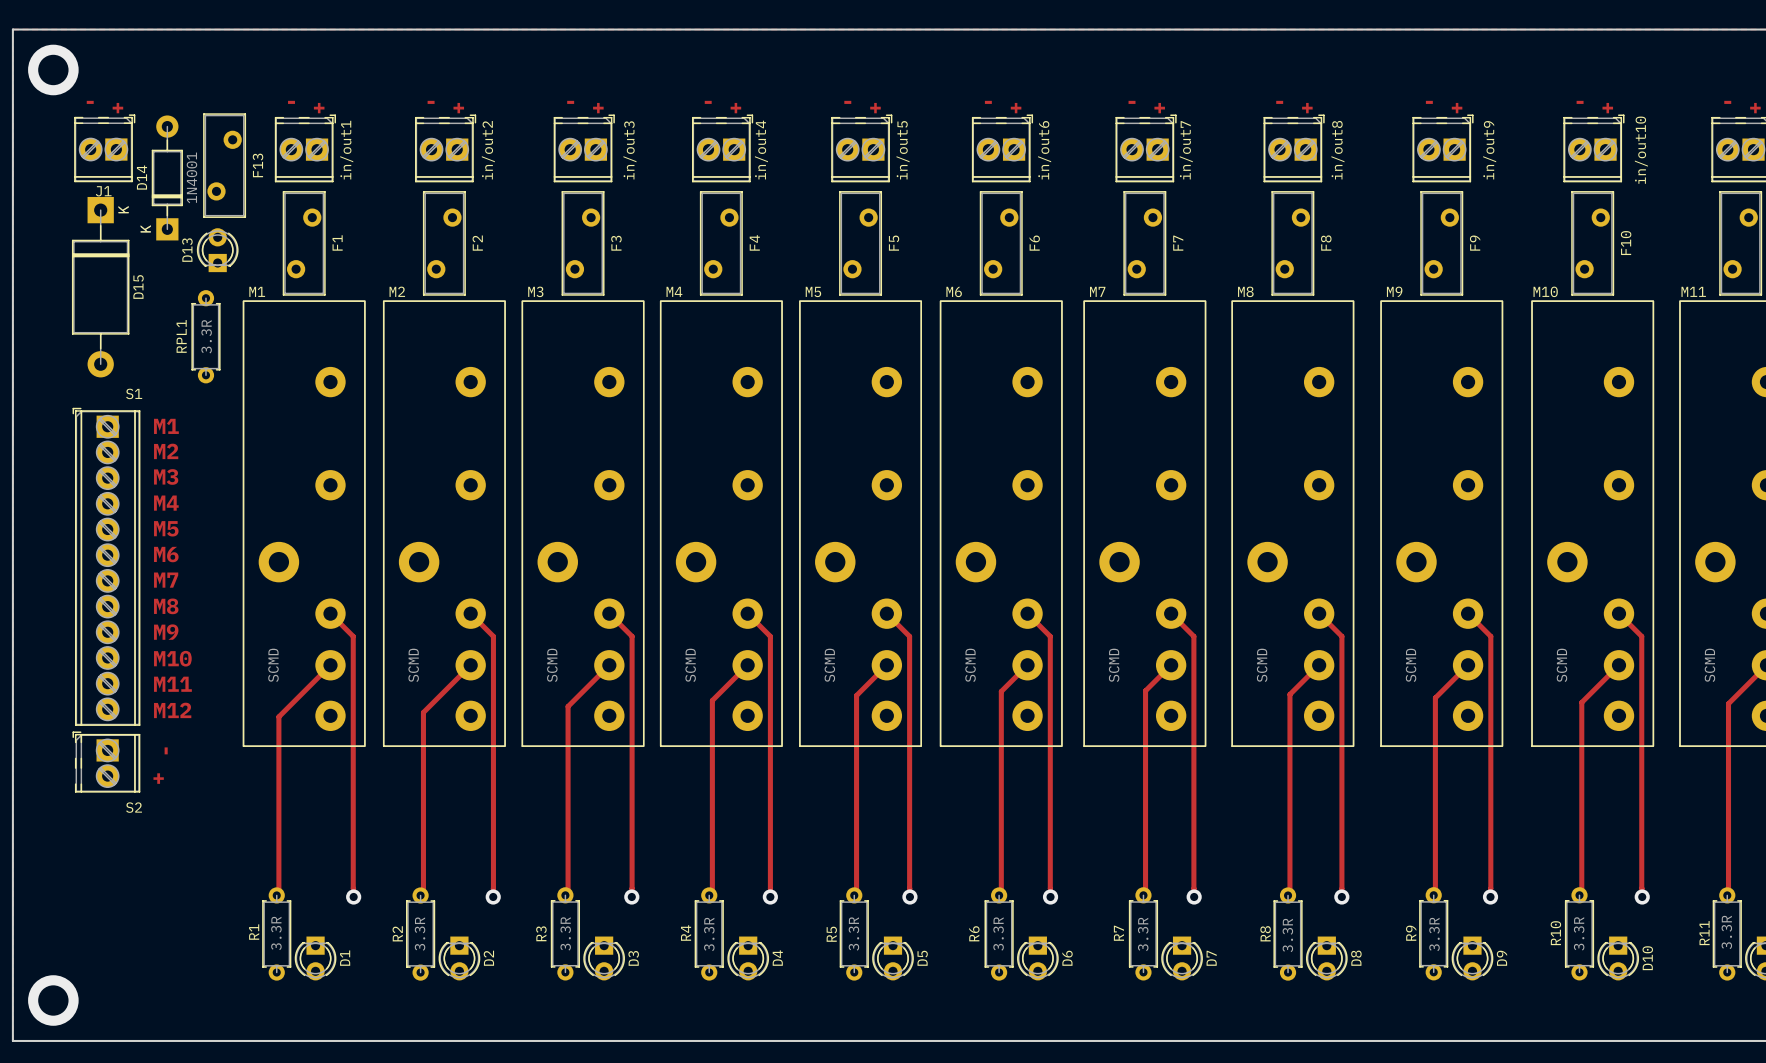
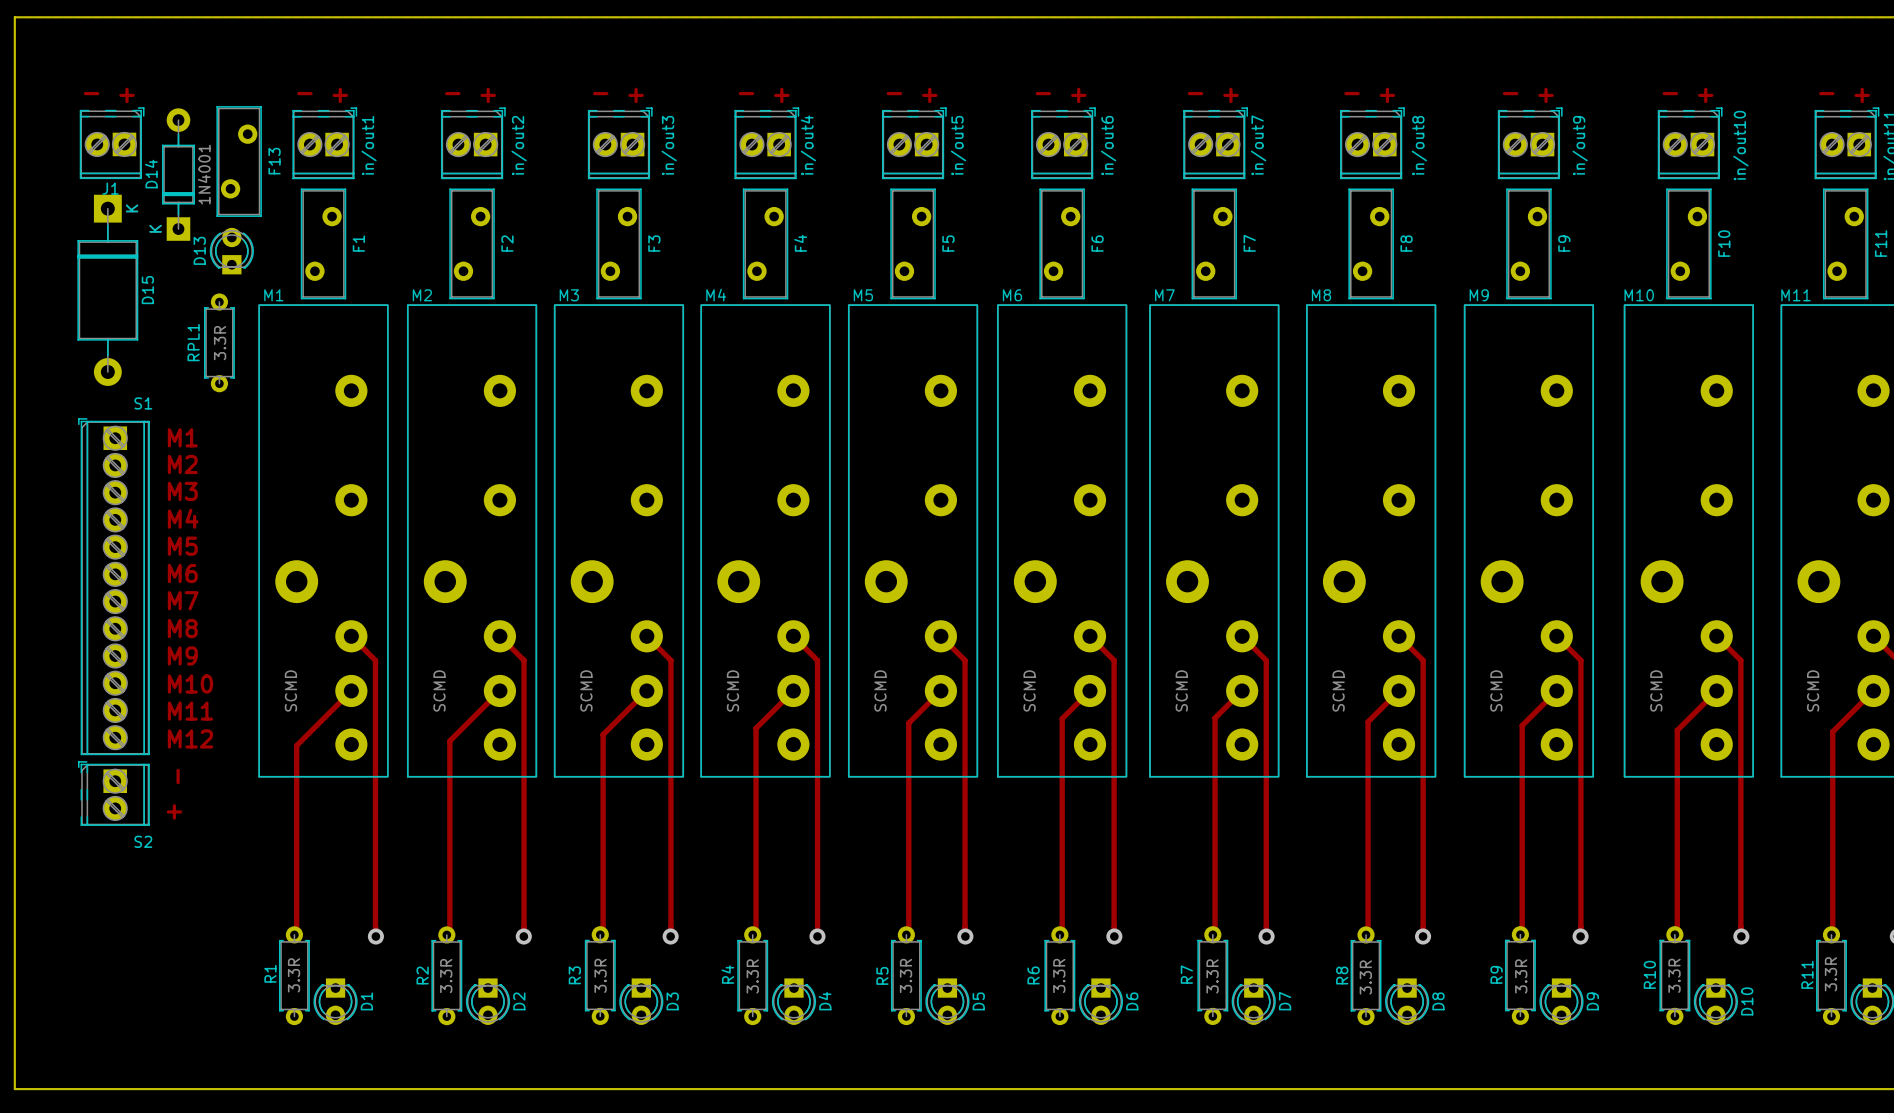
via: (53, 69) -> none
via: (53, 1000) -> none

